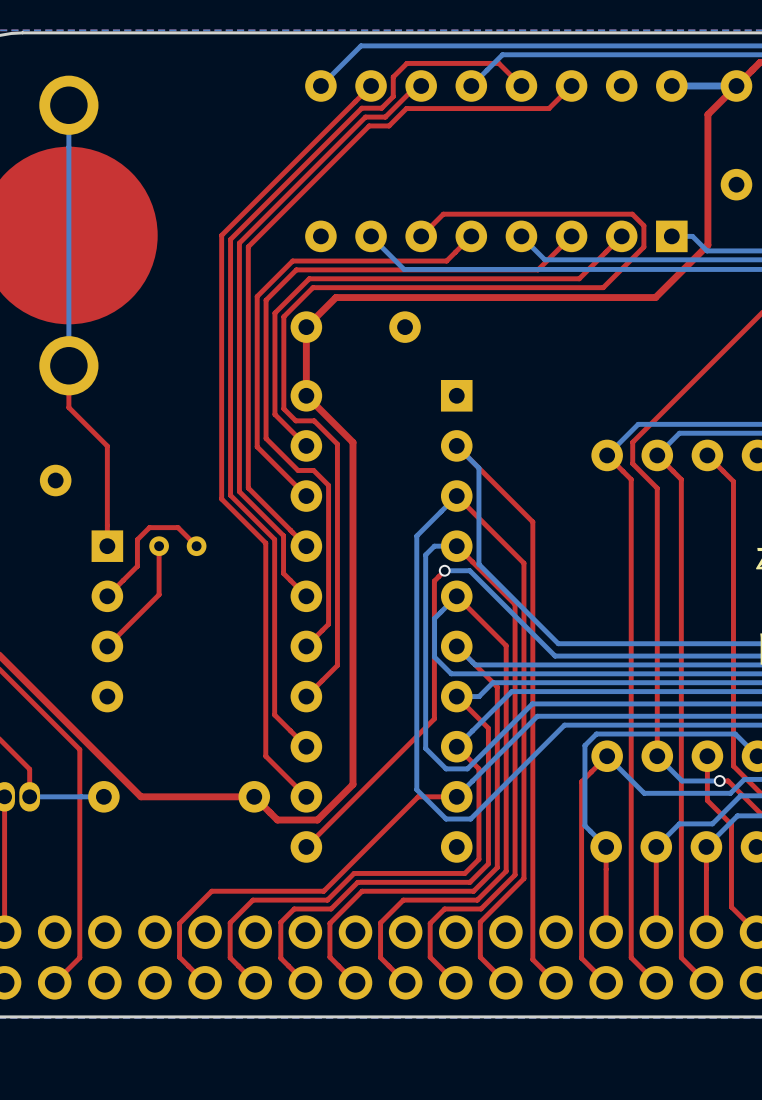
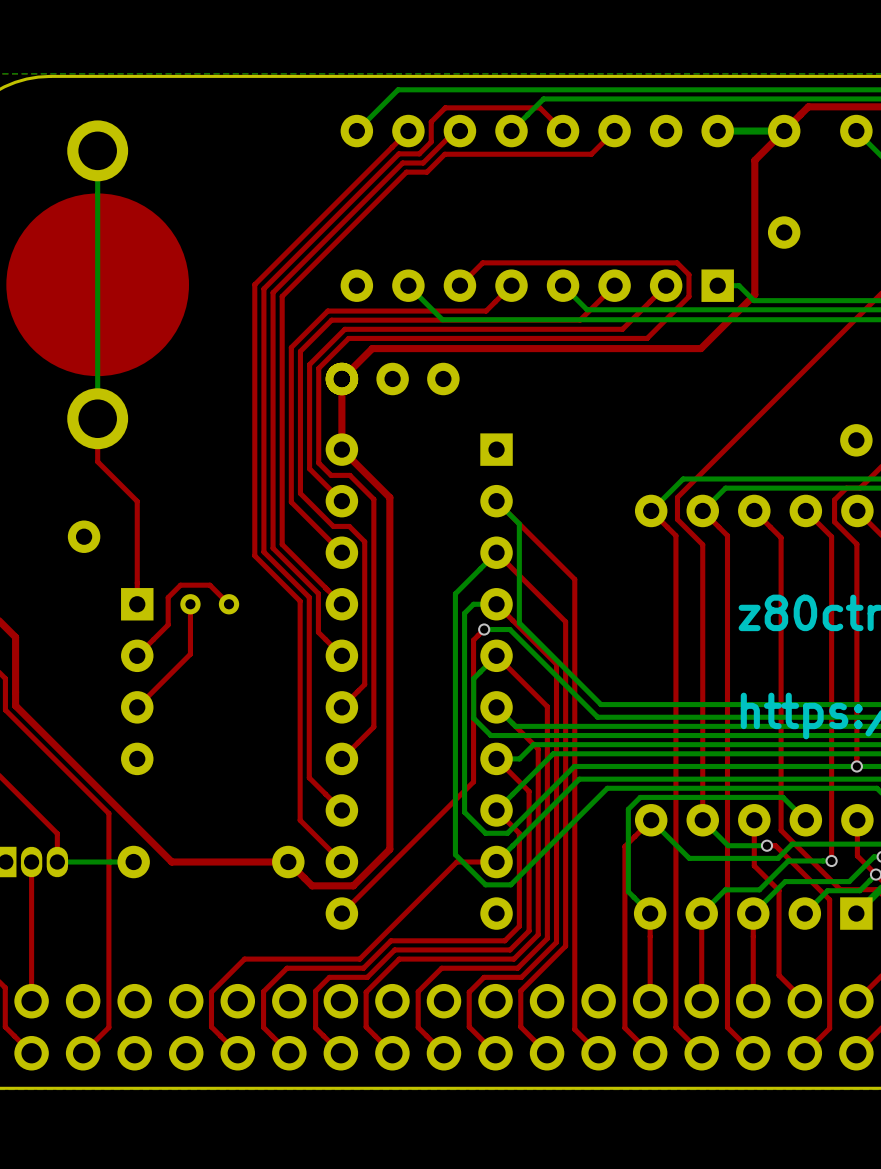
part: none -> (367, 378)

